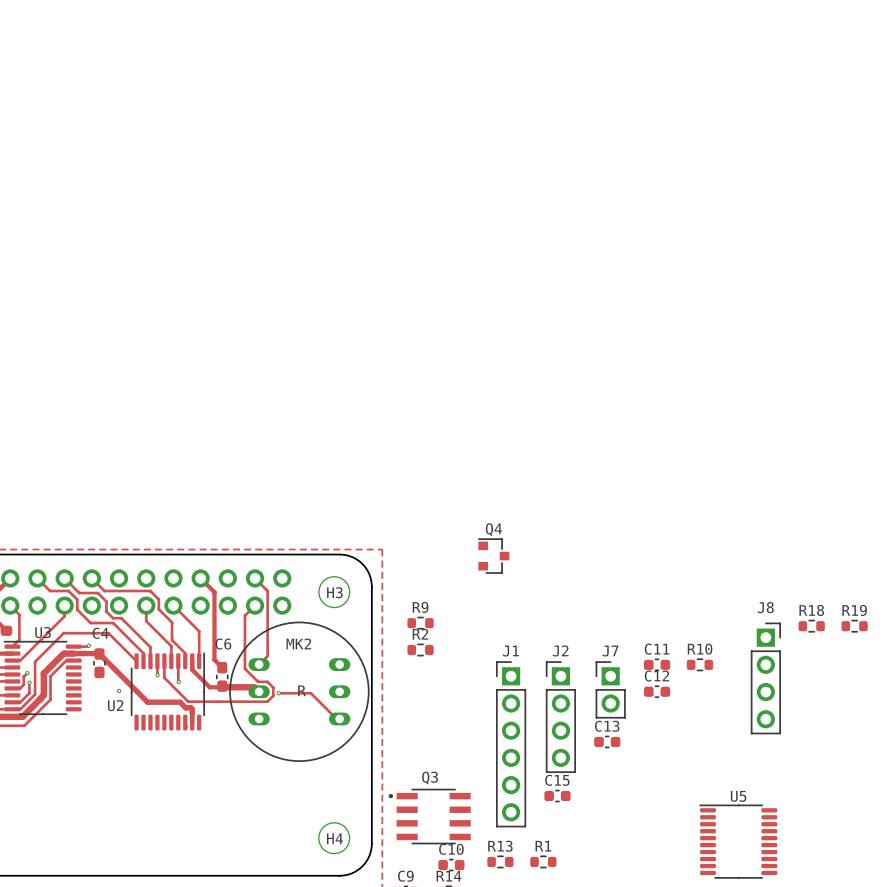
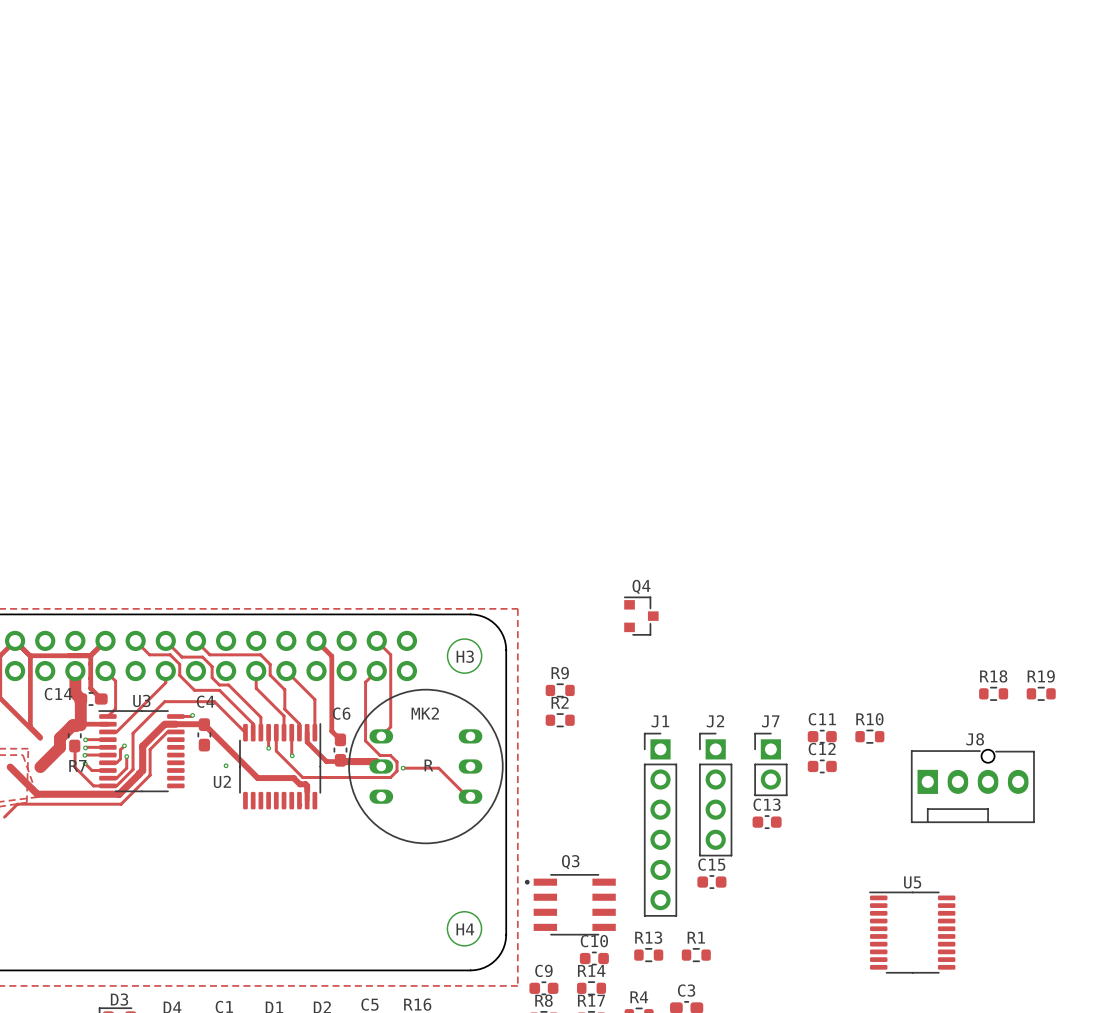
J8 name position: J8 (765, 607) -> J8 (975, 739)
J8 footprint: [750, 622, 781, 735] -> [911, 749, 1035, 823]

